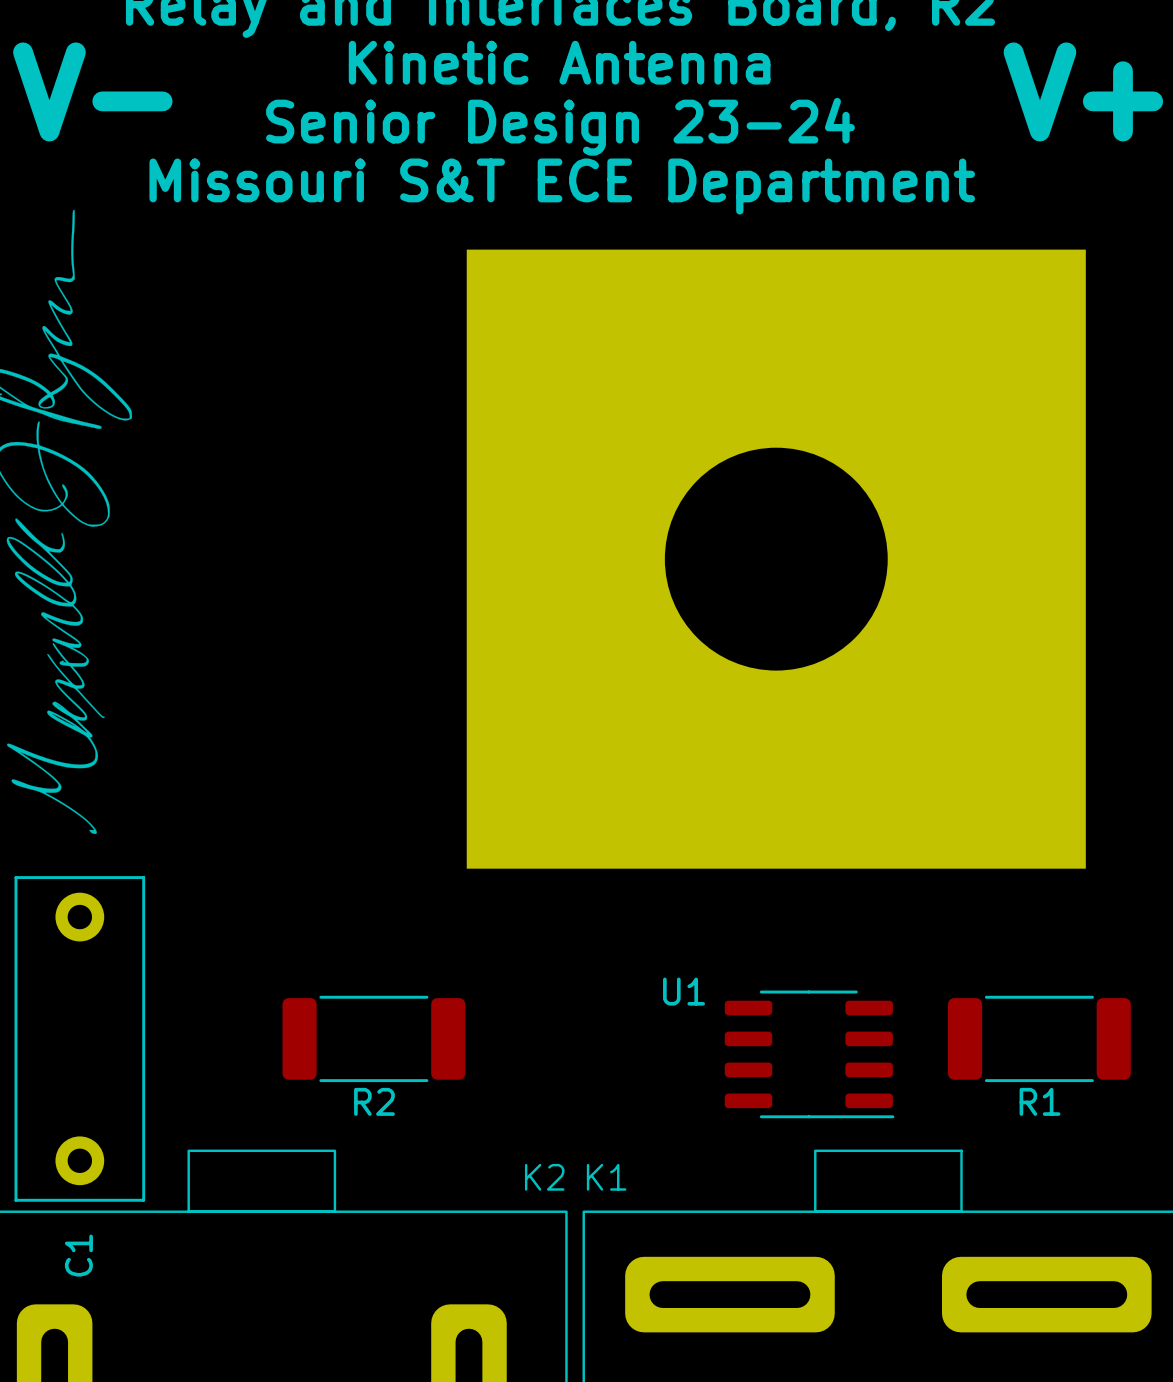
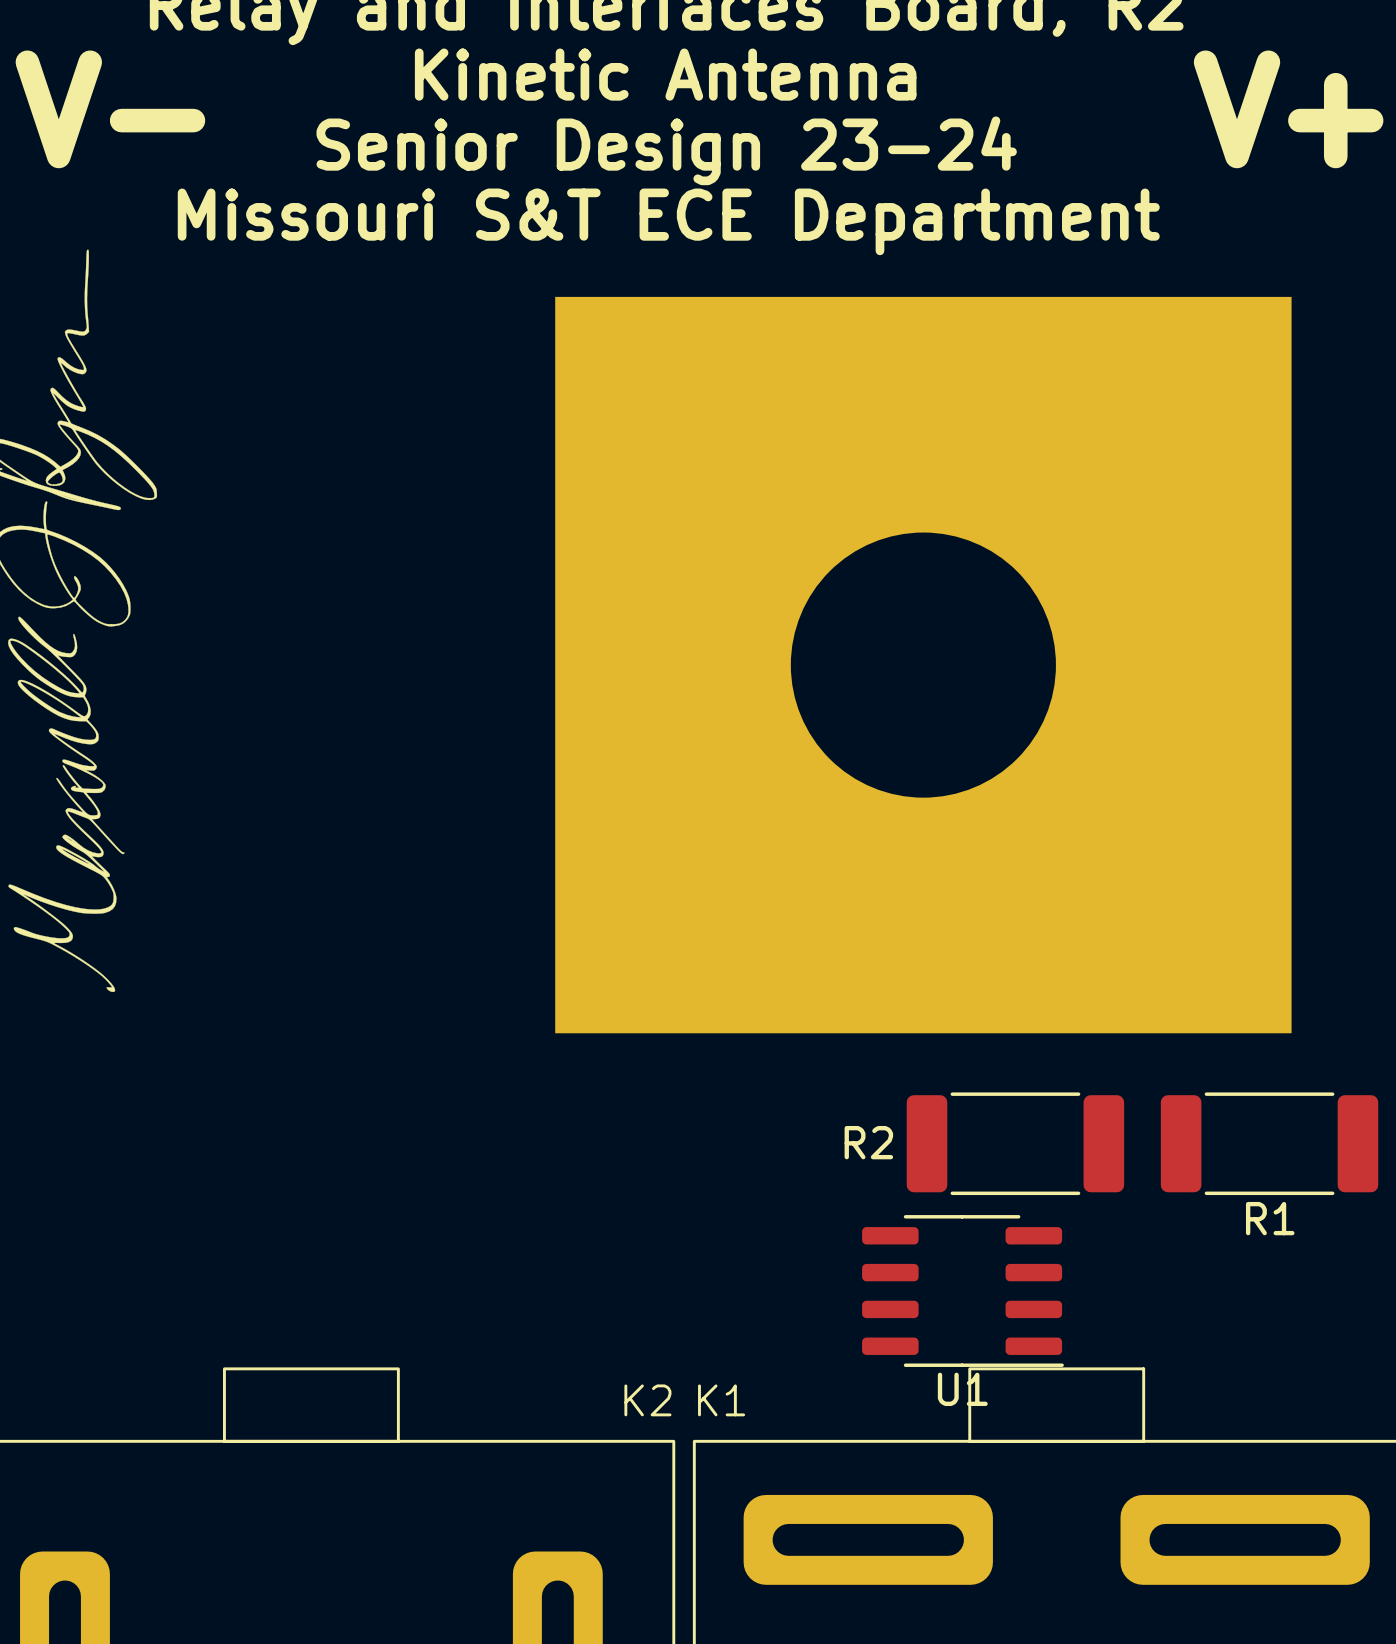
U1 name position: U1 (684, 991) -> U1 (962, 1389)
C1: (79, 1038) -> none
R2 position: (373, 1038) -> (1015, 1143)
R1 position: (1039, 1038) -> (1269, 1143)
U1 position: (809, 1054) -> (962, 1291)
R2 name position: R2 (374, 1101) -> R2 (868, 1142)

